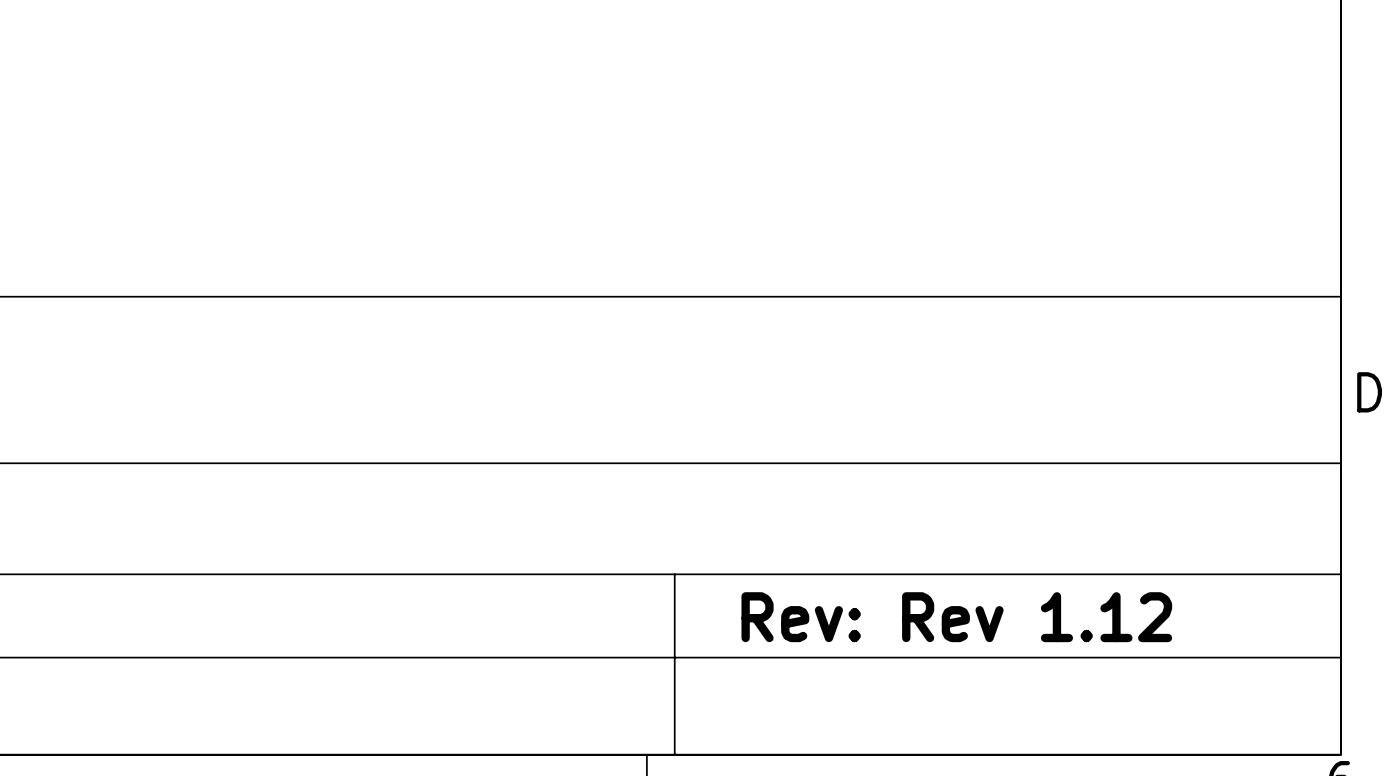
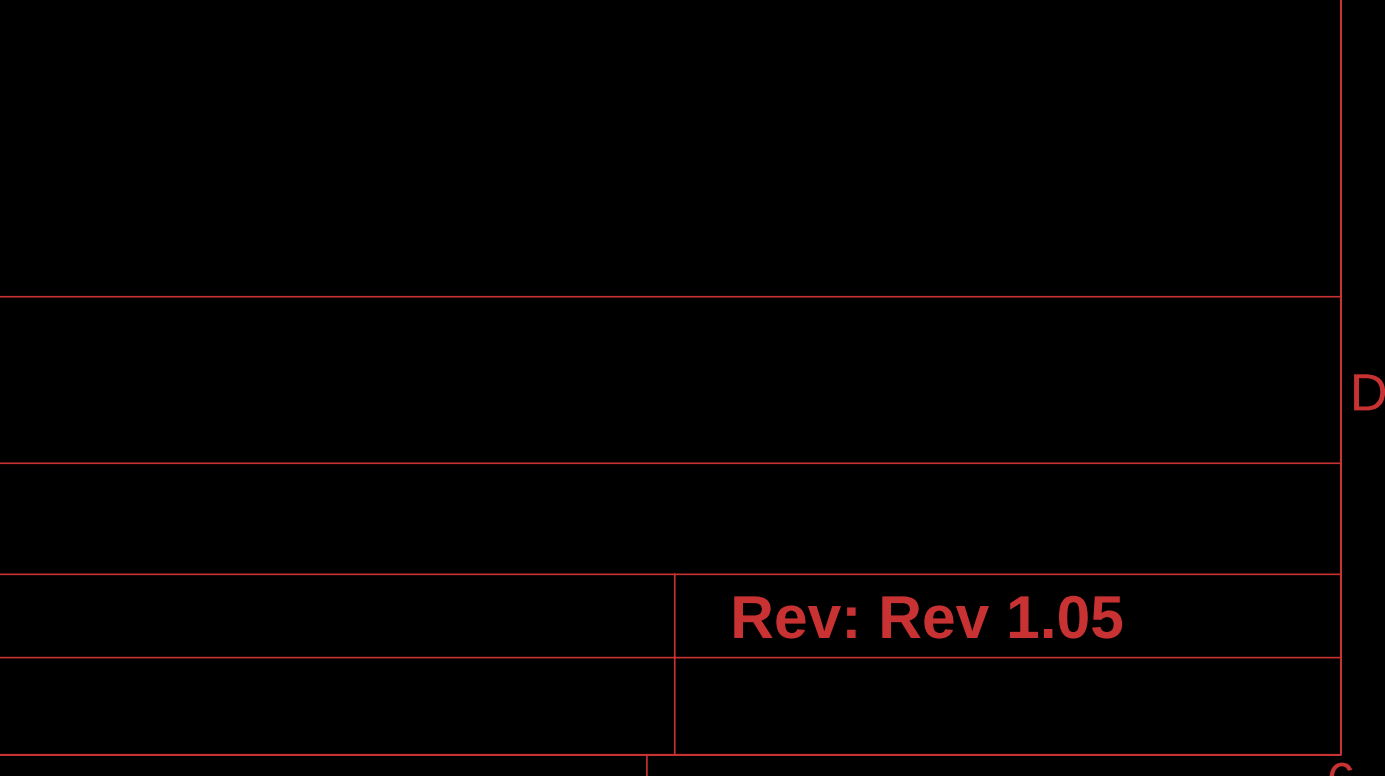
title block: Rev: Rev 1.12 (956, 617) -> Rev: Rev 1.05 (928, 617)

